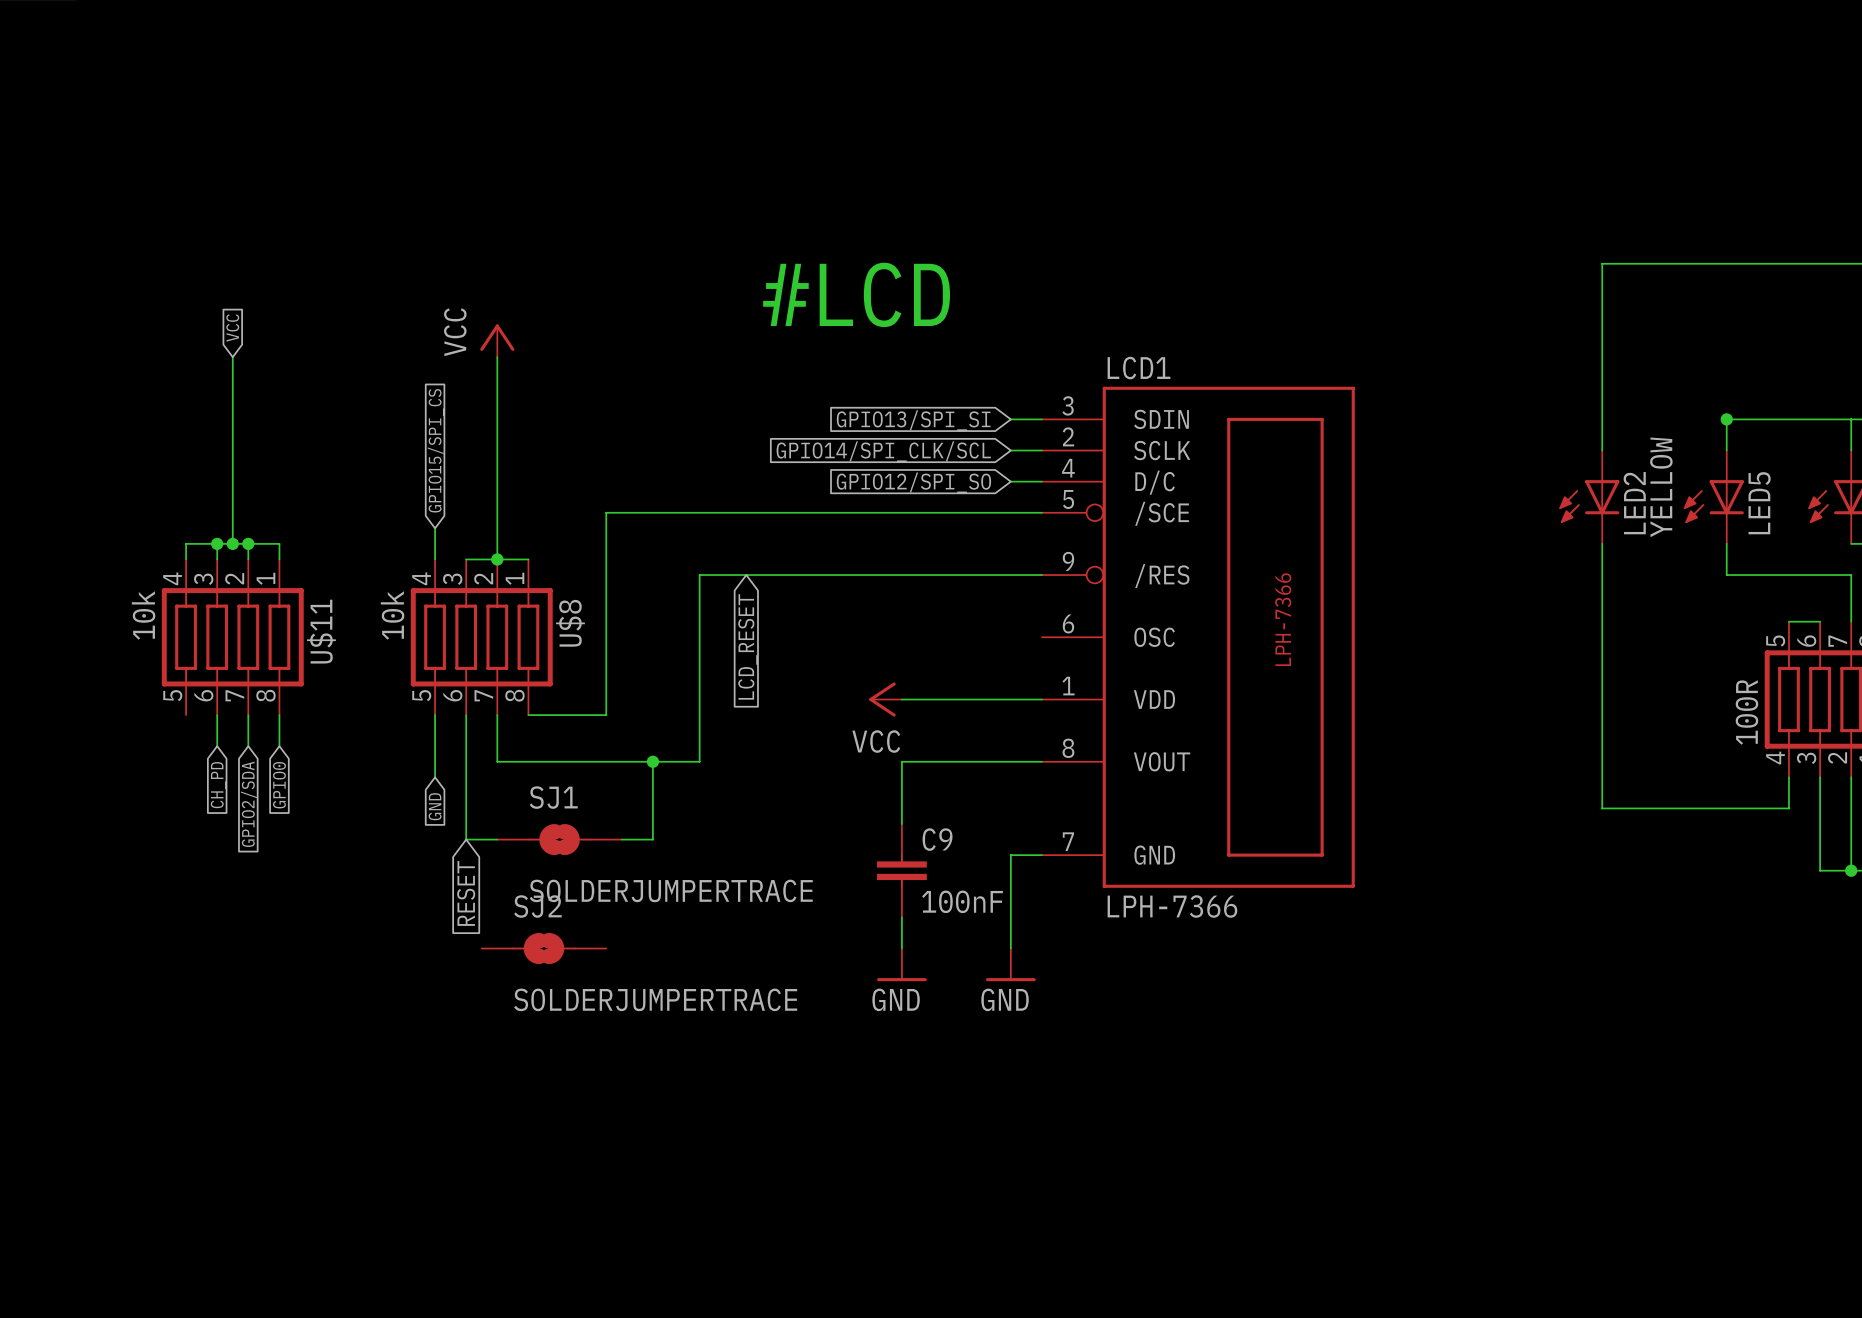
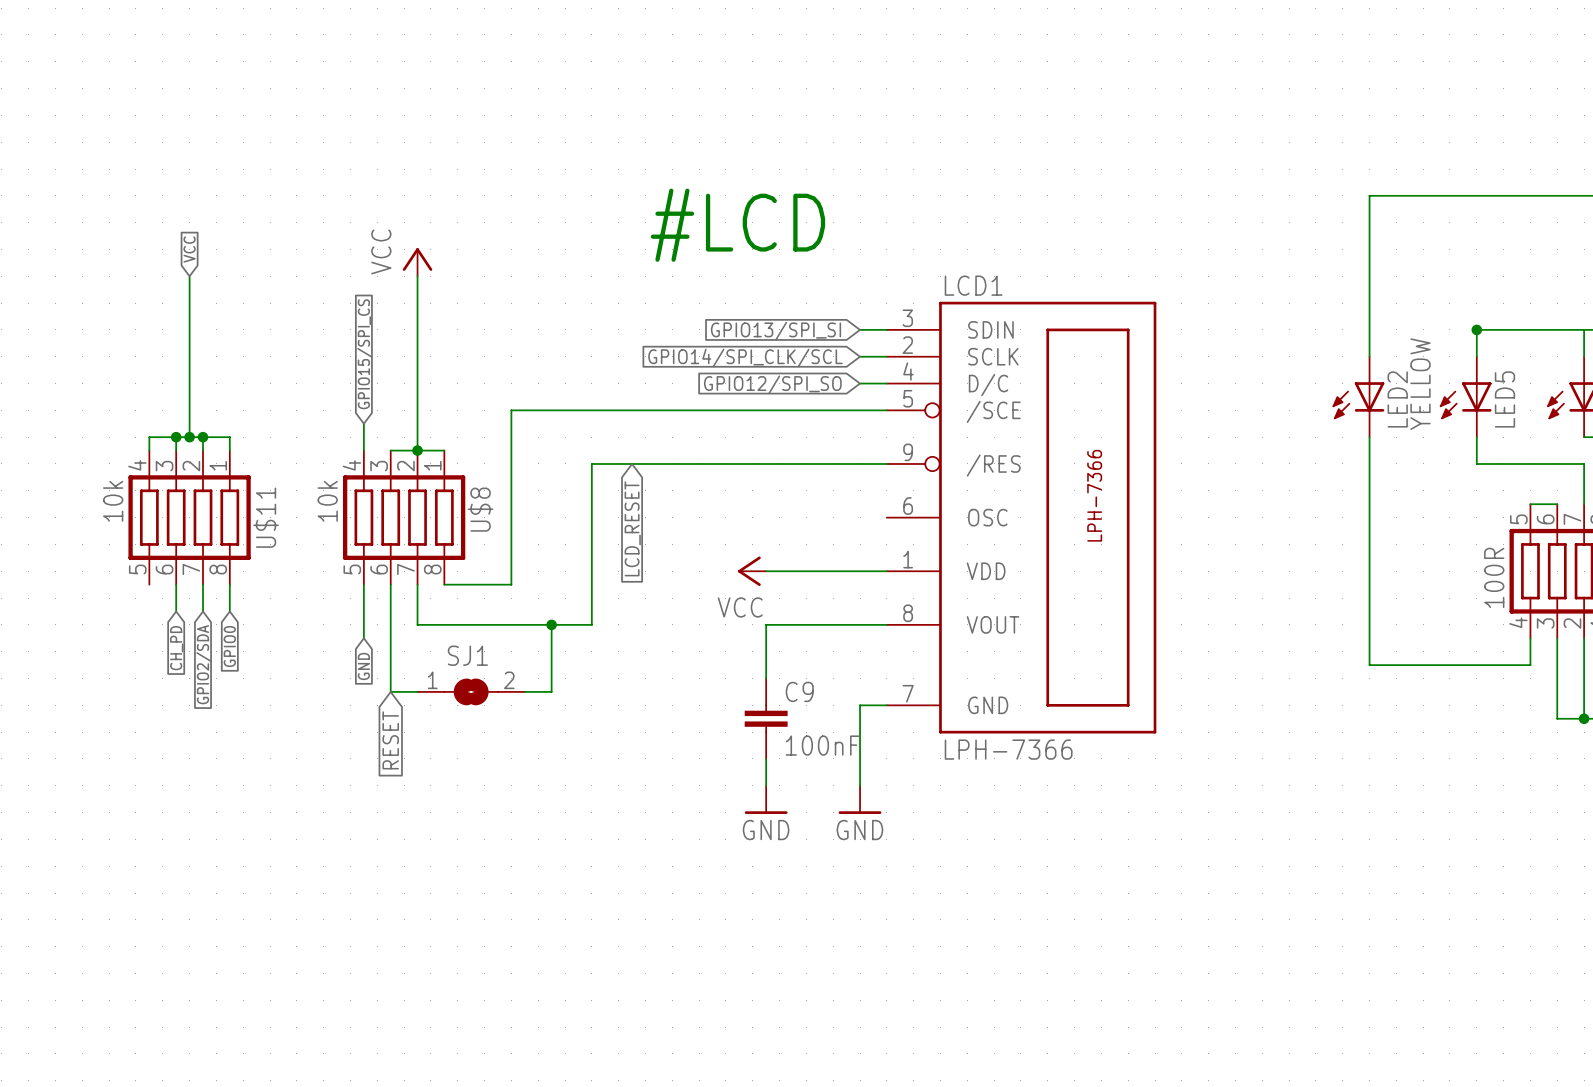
SJ1 pin number: none -> 2 (509, 680)
SJ1 pin number: none -> 1 (432, 680)
SJ1 value: SOLDERJUMPERTRACE (671, 890) -> none
SJ2: SOLDERJUMPERTRACE (544, 948) -> none

